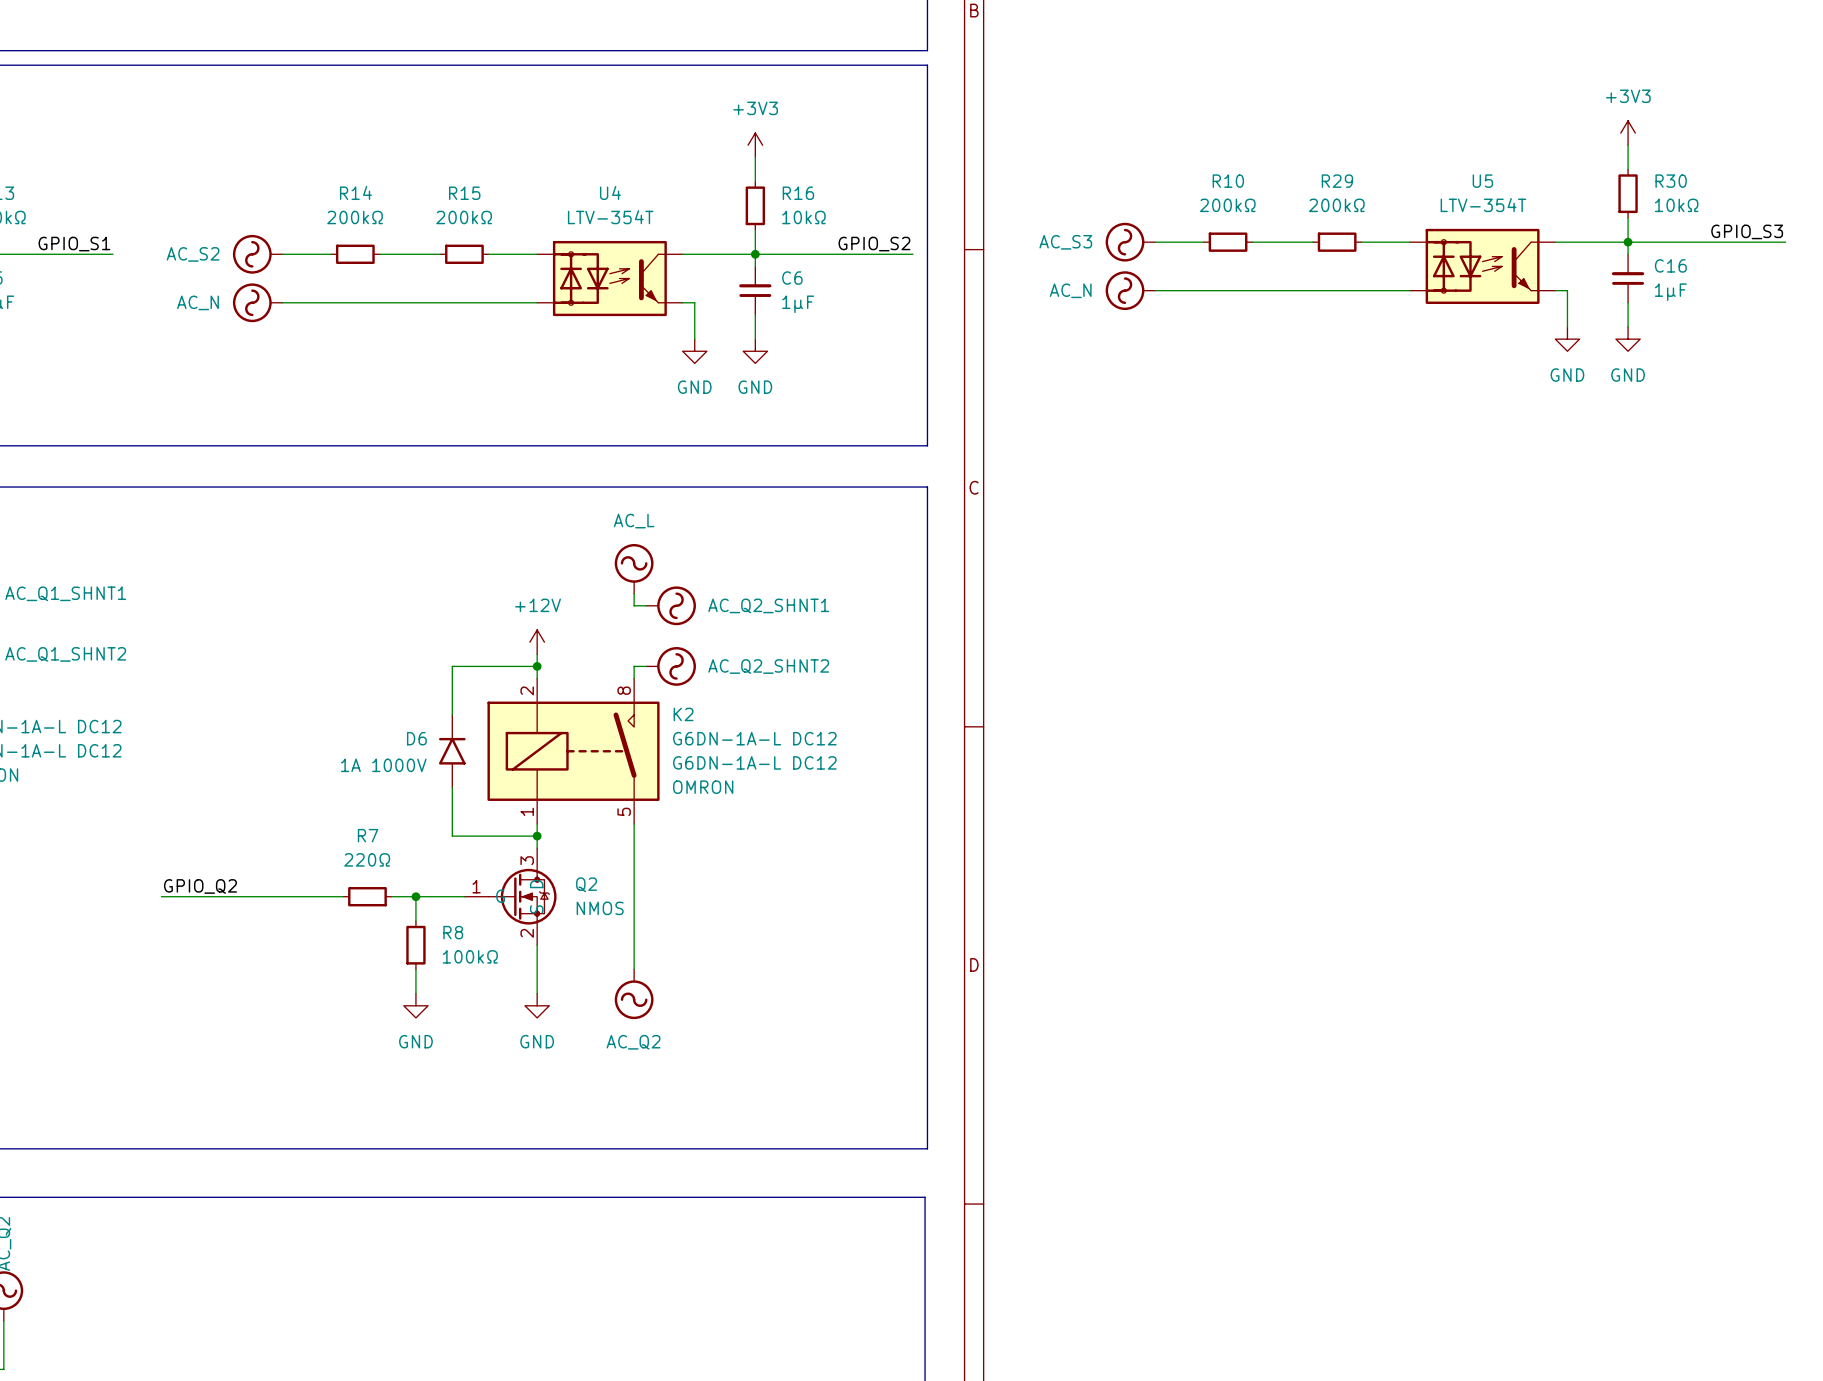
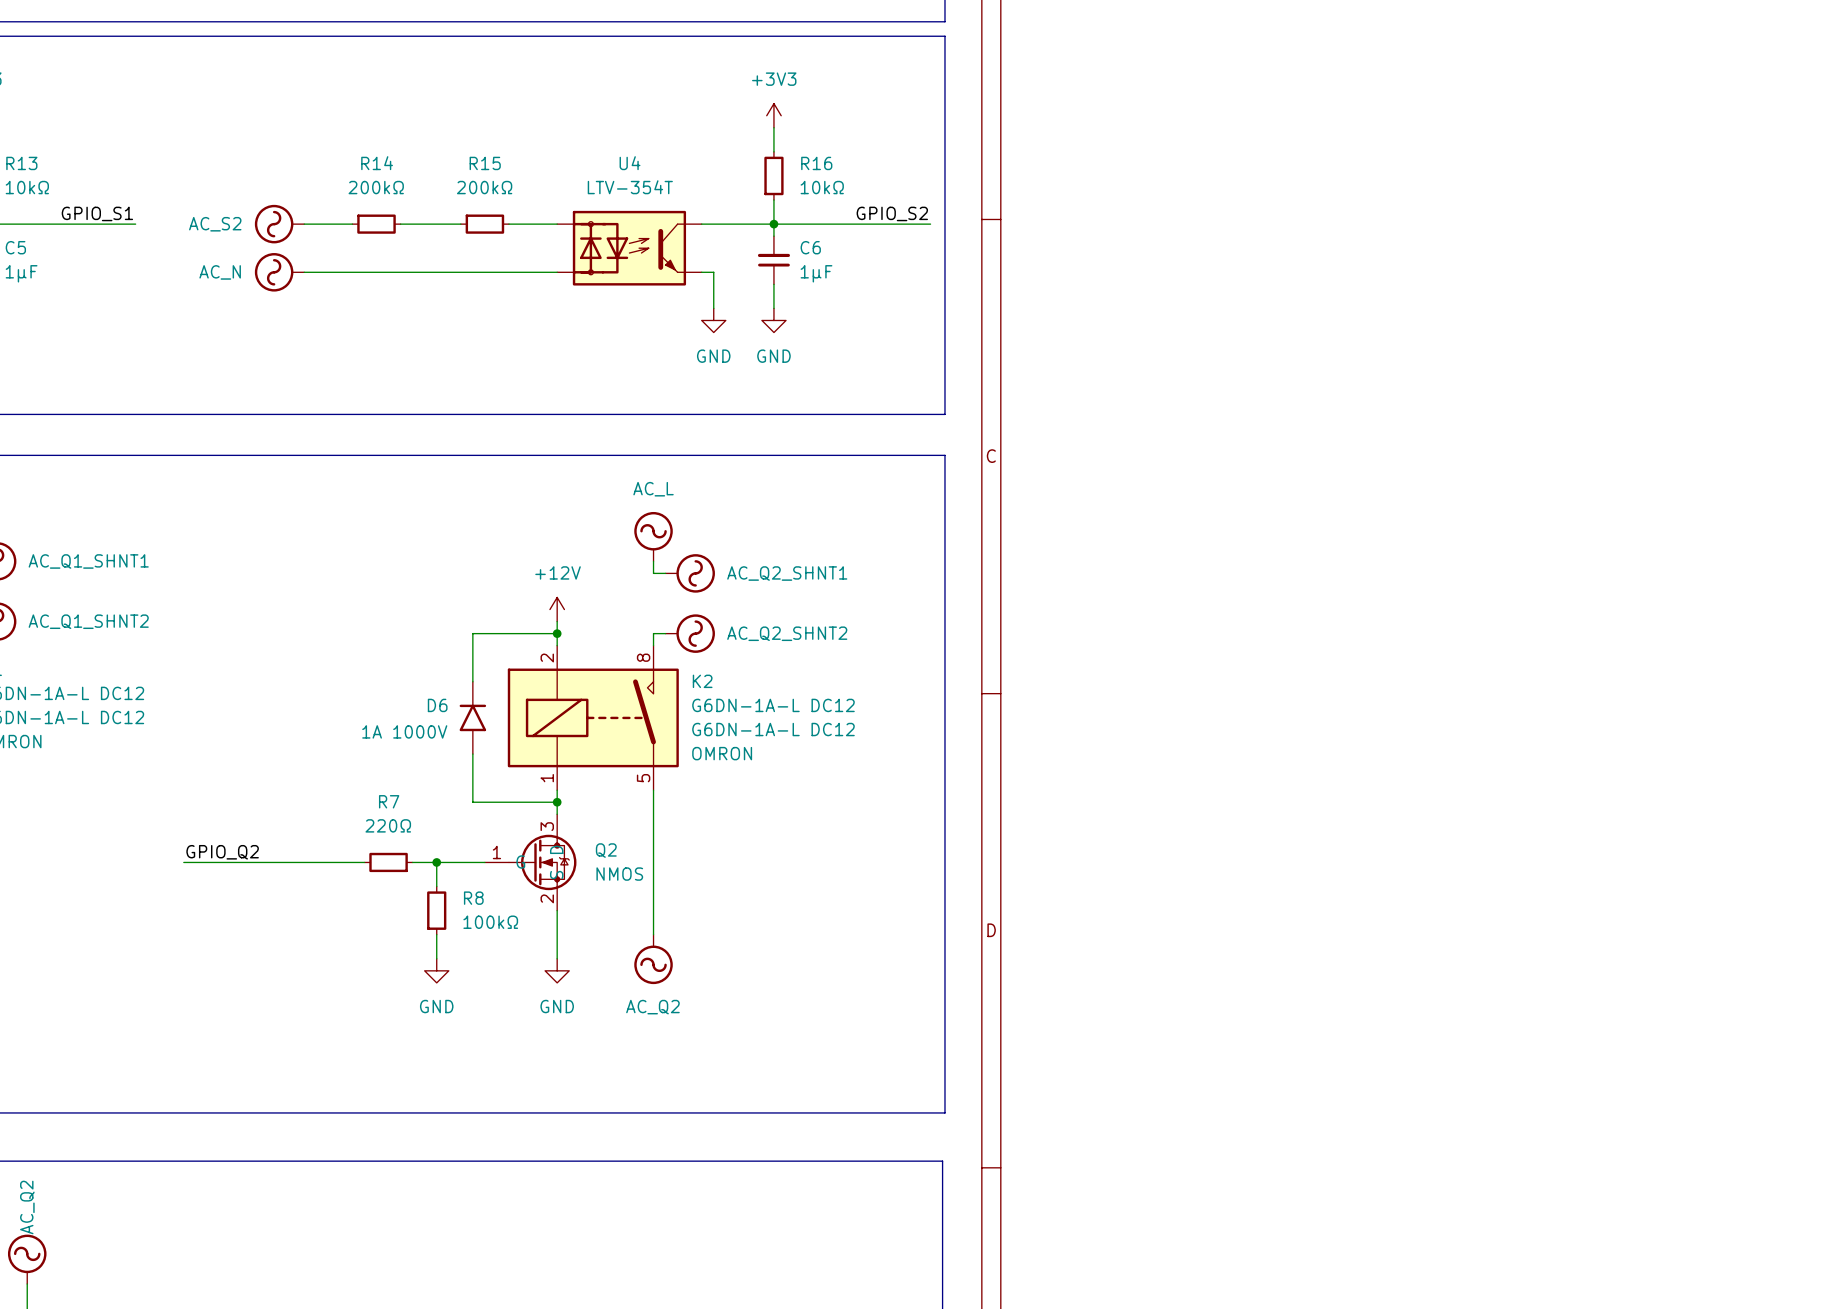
power symbol: +3V3 (1628, 133) -> none
wire: (1628, 145) (1628, 169) -> none
R30: (1628, 193) -> none
wire: (1628, 217) (1628, 254) -> none
label: GPIO_S3 (1747, 231) -> none
power symbol: AC_S3 (1130, 242) -> none
wire: (1155, 242) (1203, 242) -> none
R10: (1228, 242) -> none
wire: (1252, 242) (1312, 242) -> none
R29: (1337, 242) -> none
wire: (1361, 242) (1409, 242) -> none
wire: (1555, 242) (1785, 242) -> none
junction: (1628, 242) -> none
U5: (1482, 266) -> none
C16: (1628, 278) -> none
power symbol: AC_N (1130, 290) -> none
wire: (1155, 290) (1409, 290) -> none
wire: (1555, 290) (1567, 290) (1567, 327) -> none
wire: (1628, 302) (1628, 327) -> none
power symbol: GND (1567, 339) -> none
power symbol: GND (1628, 339) -> none

